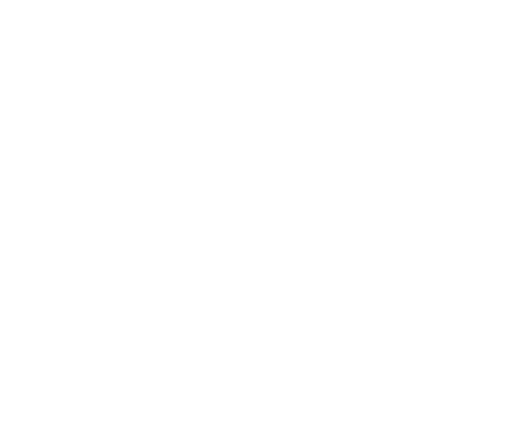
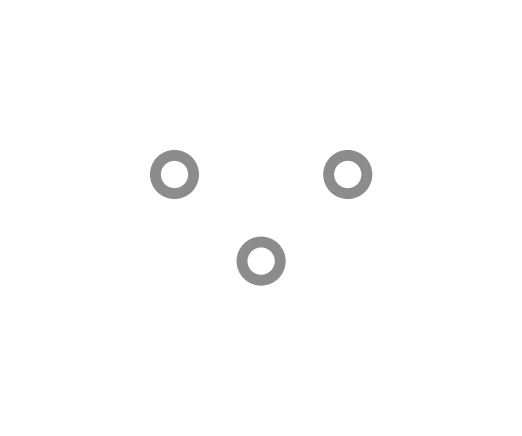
part: none -> (261, 217)

